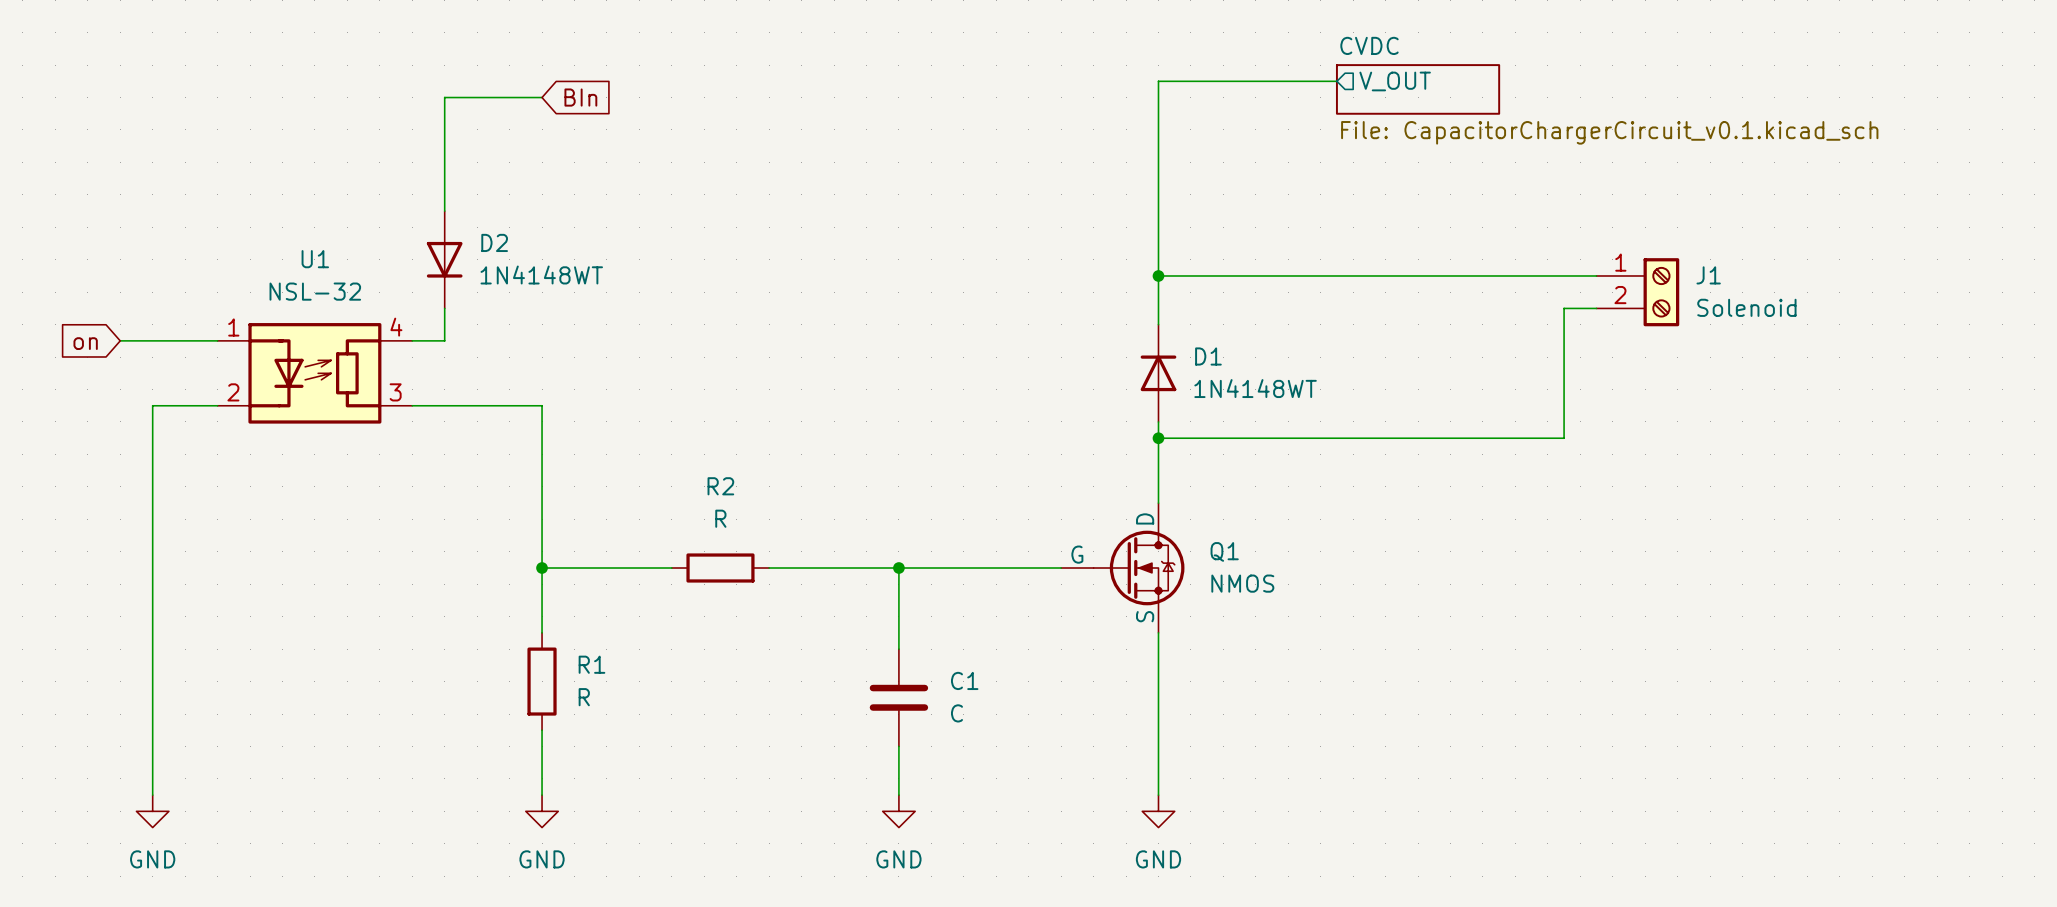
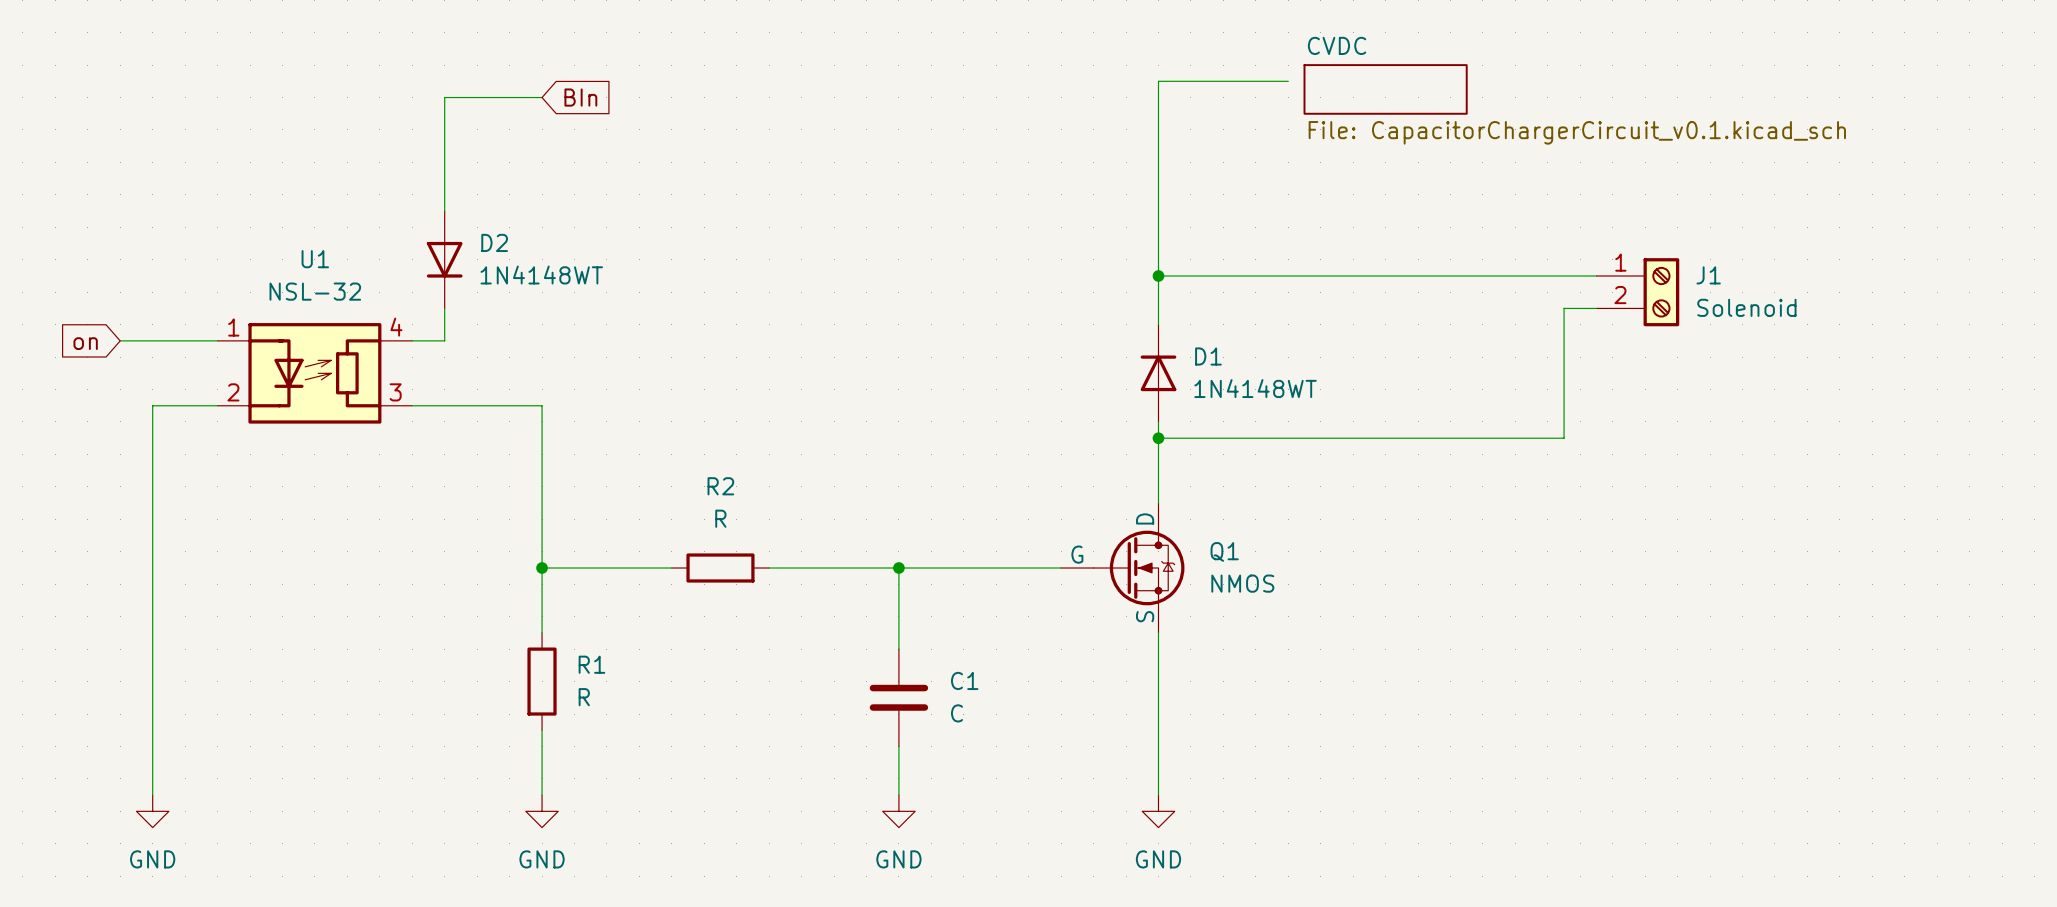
wire: (1288, 81) (1336, 81) -> none
sheet pin: V_OUT (1395, 81) -> none
sheet CVDC position: (1418, 89) -> (1385, 89)

